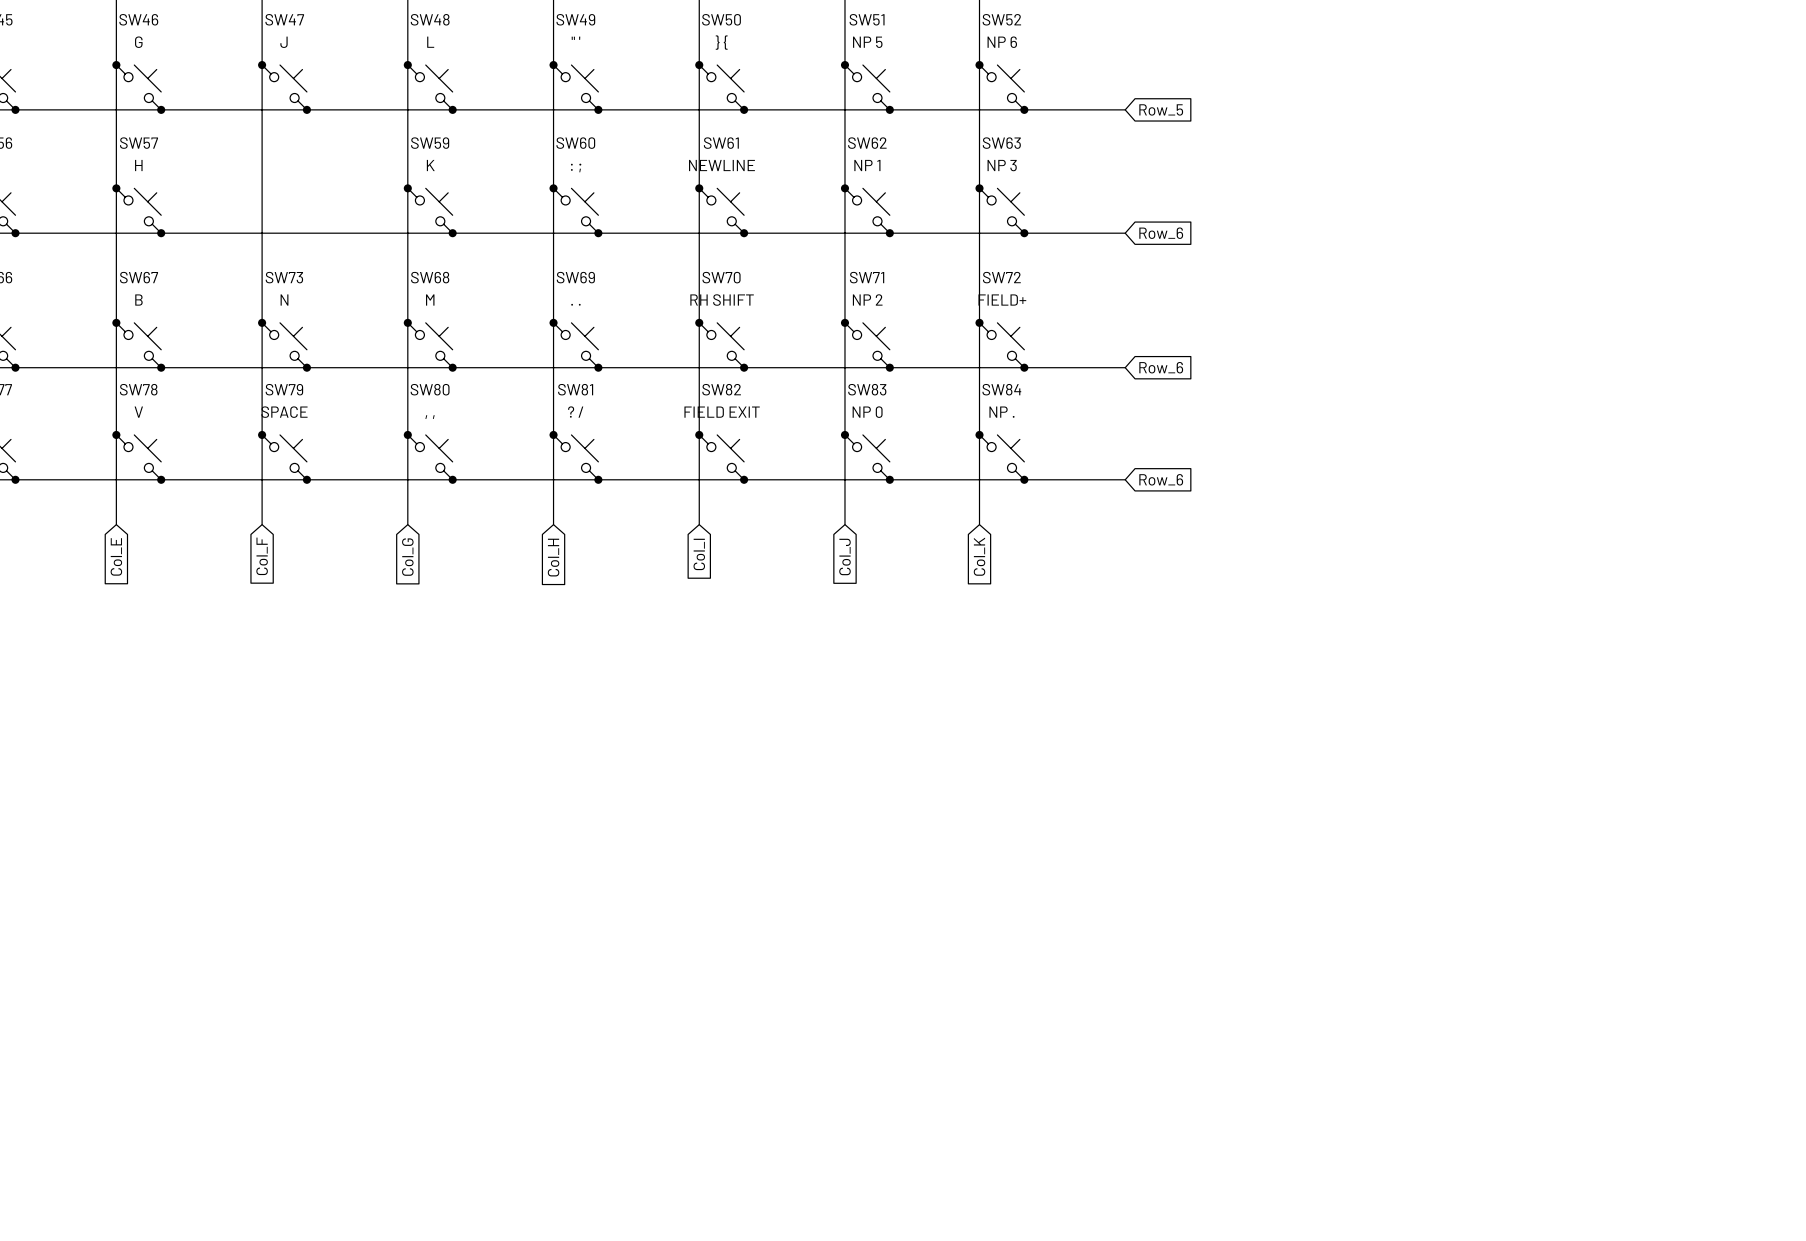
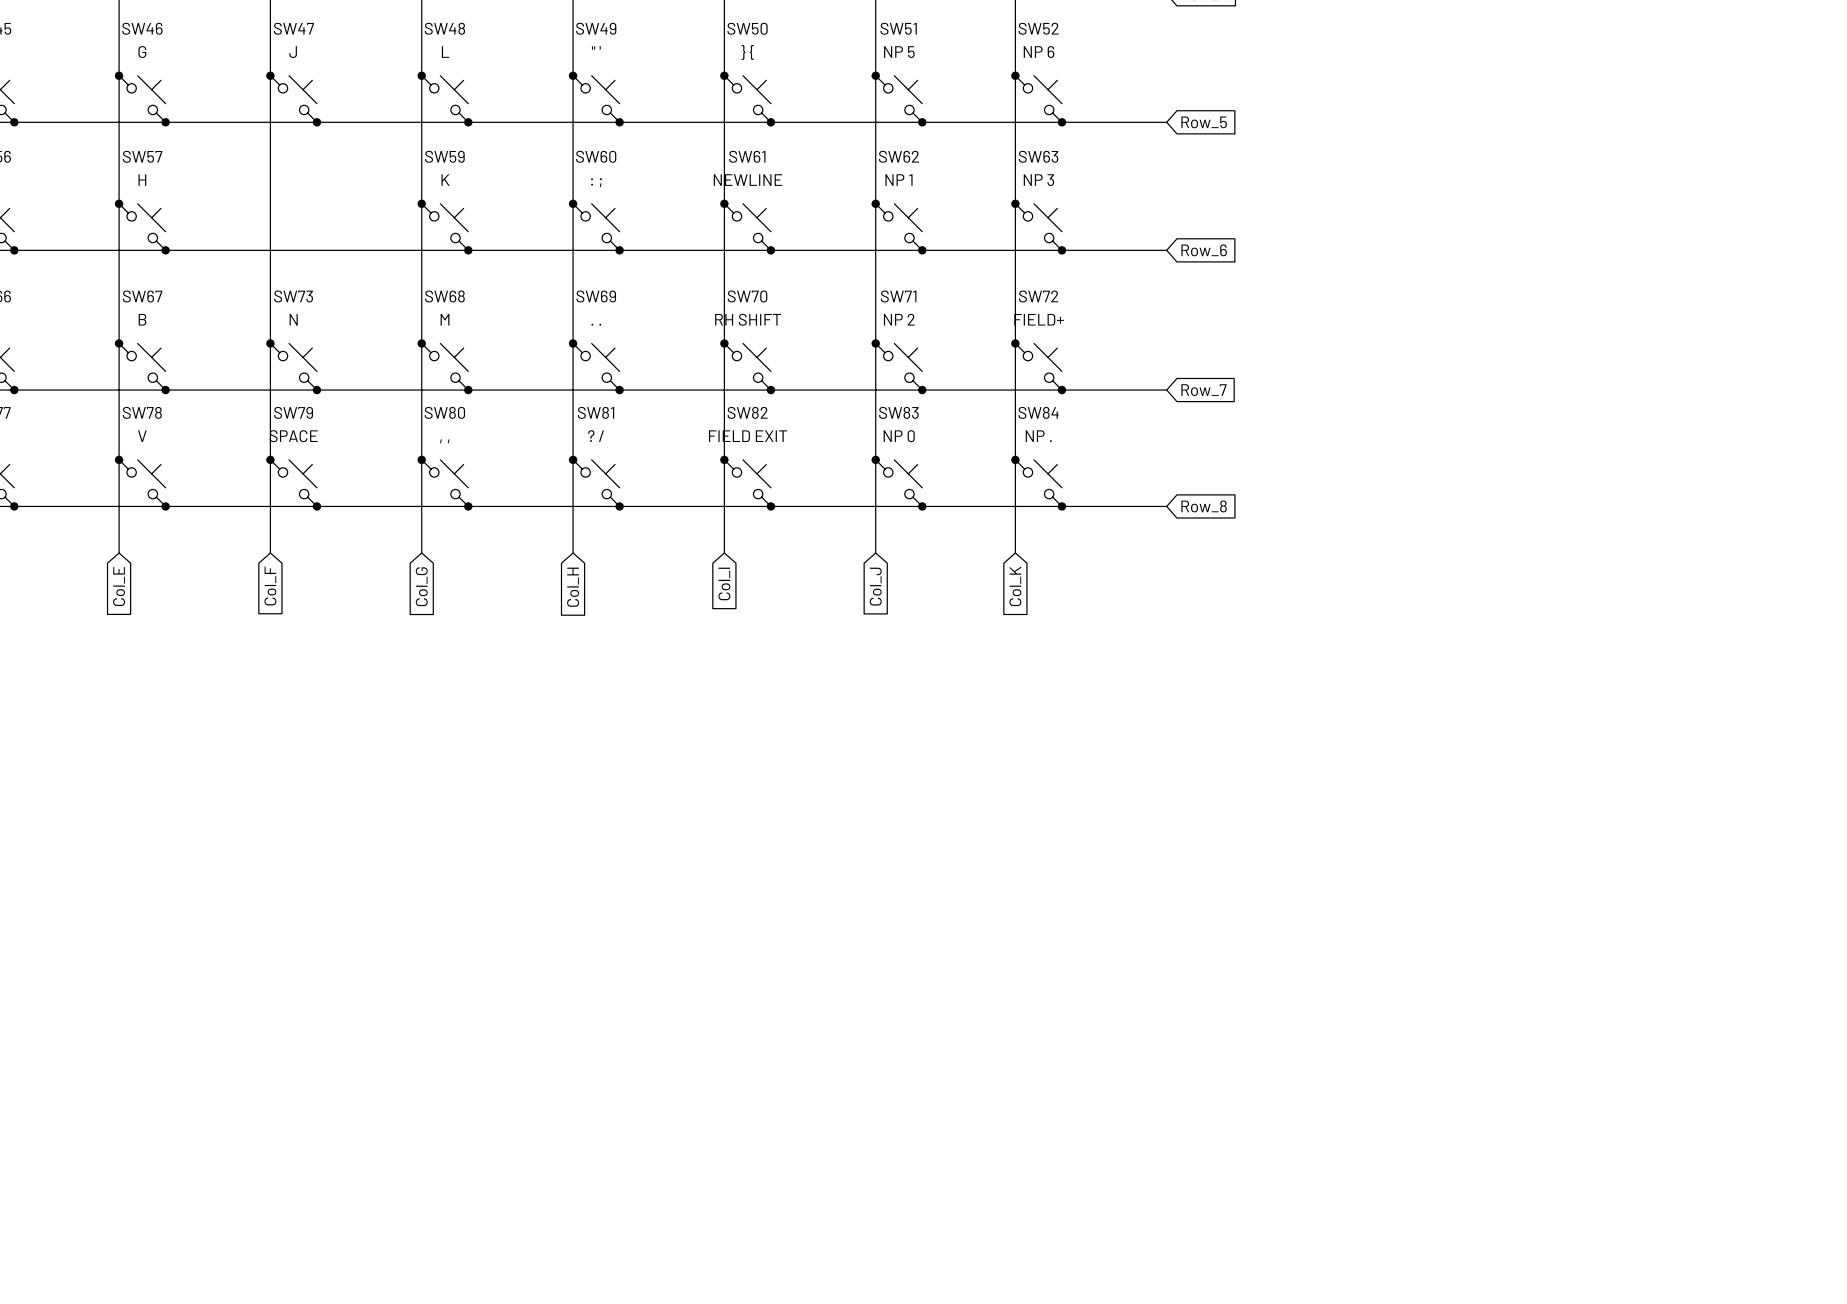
global label: Row_6 (1161, 367) -> Row_7 (1203, 390)
global label: Row_6 (1161, 479) -> Row_8 (1204, 506)

